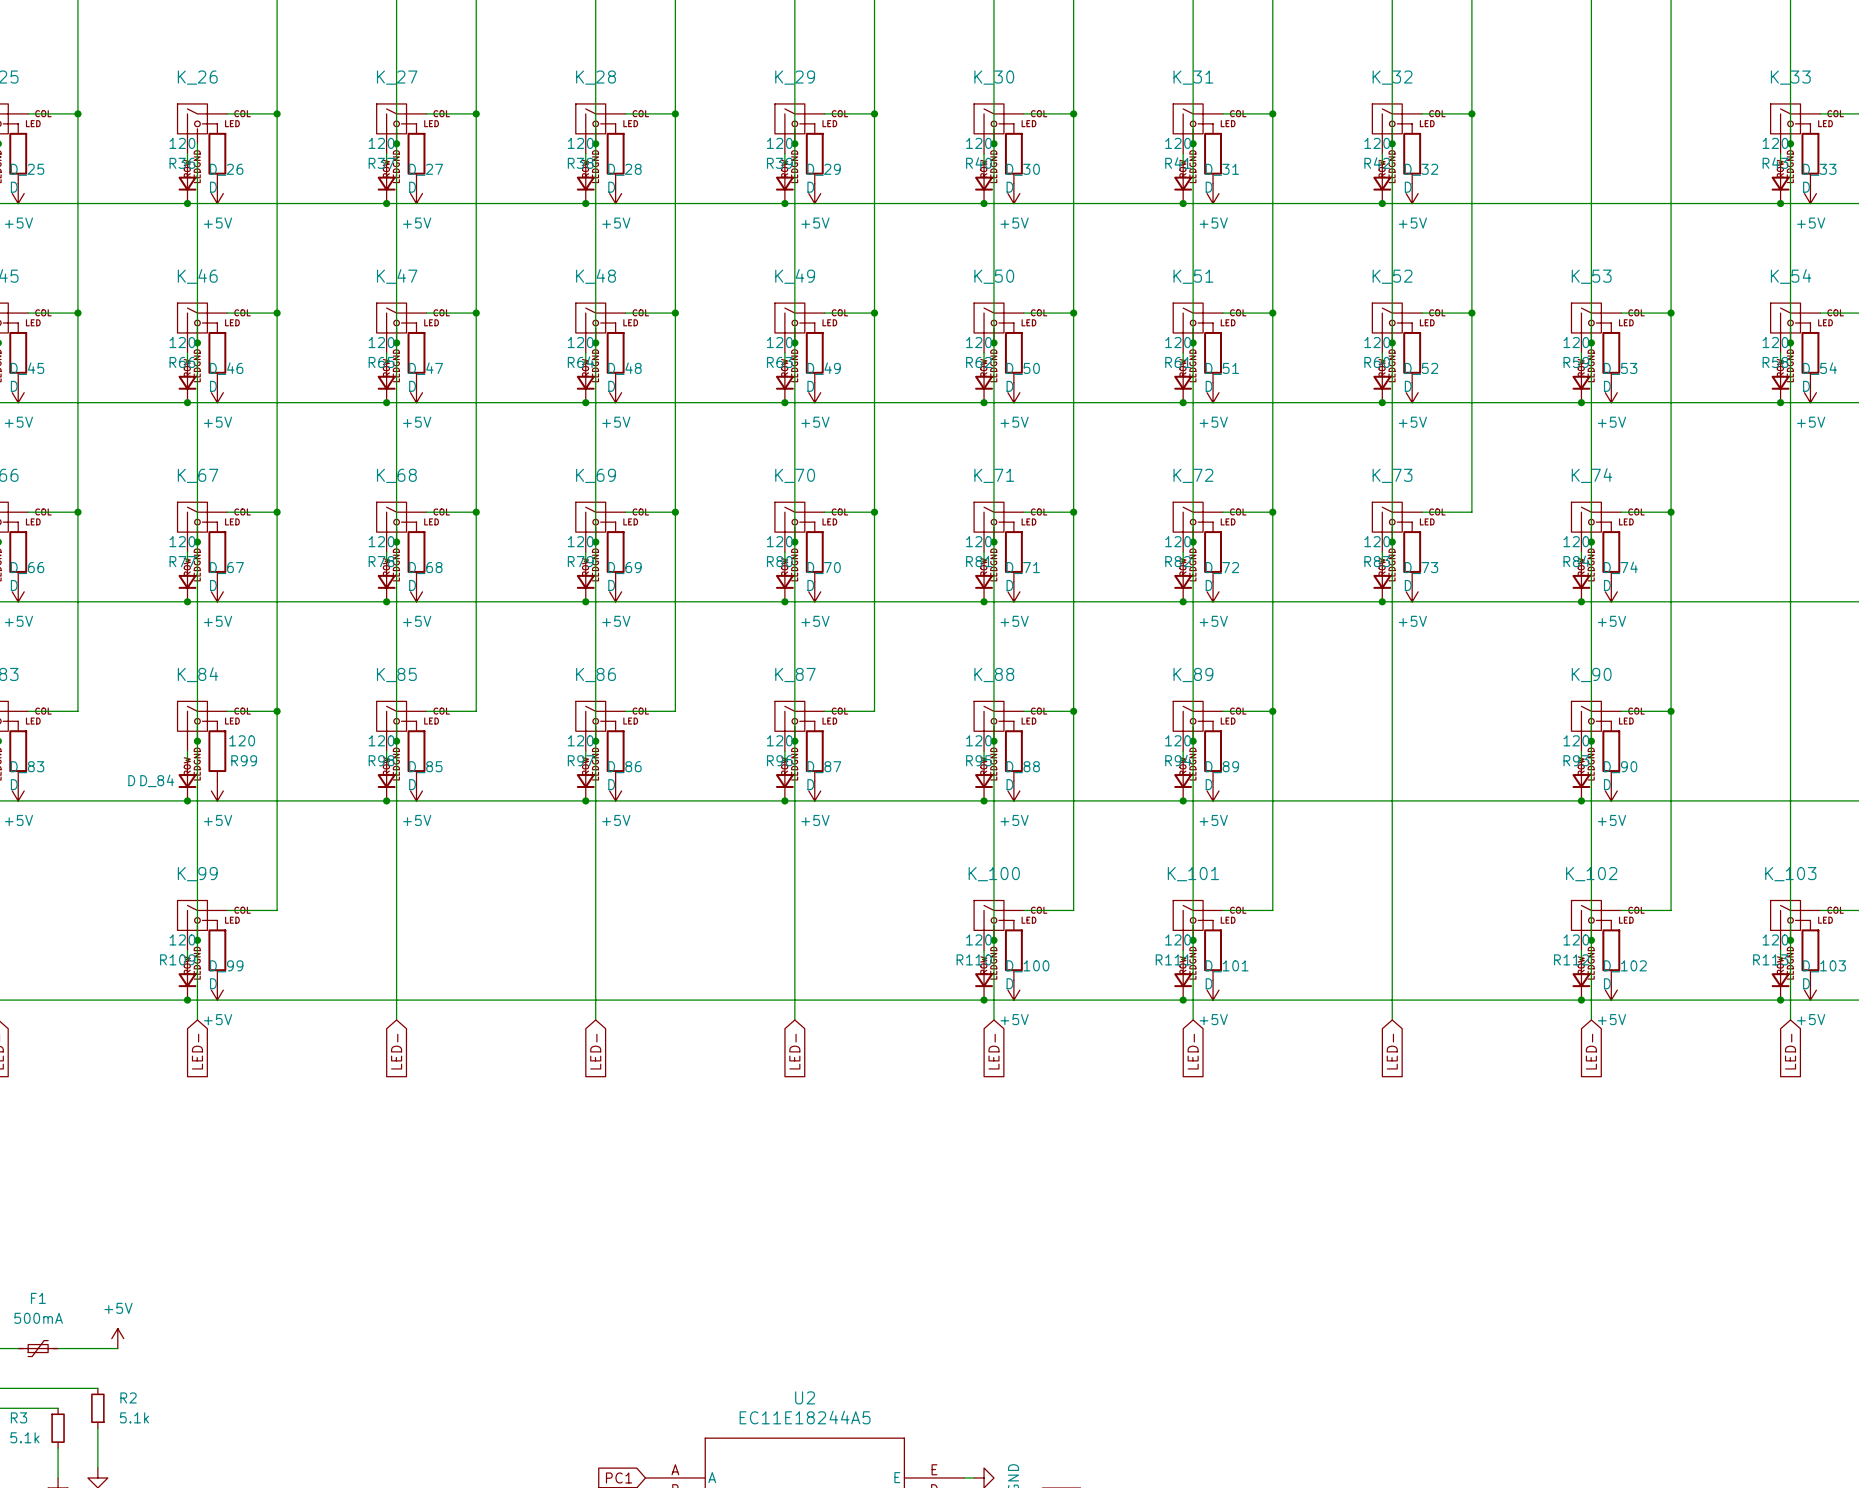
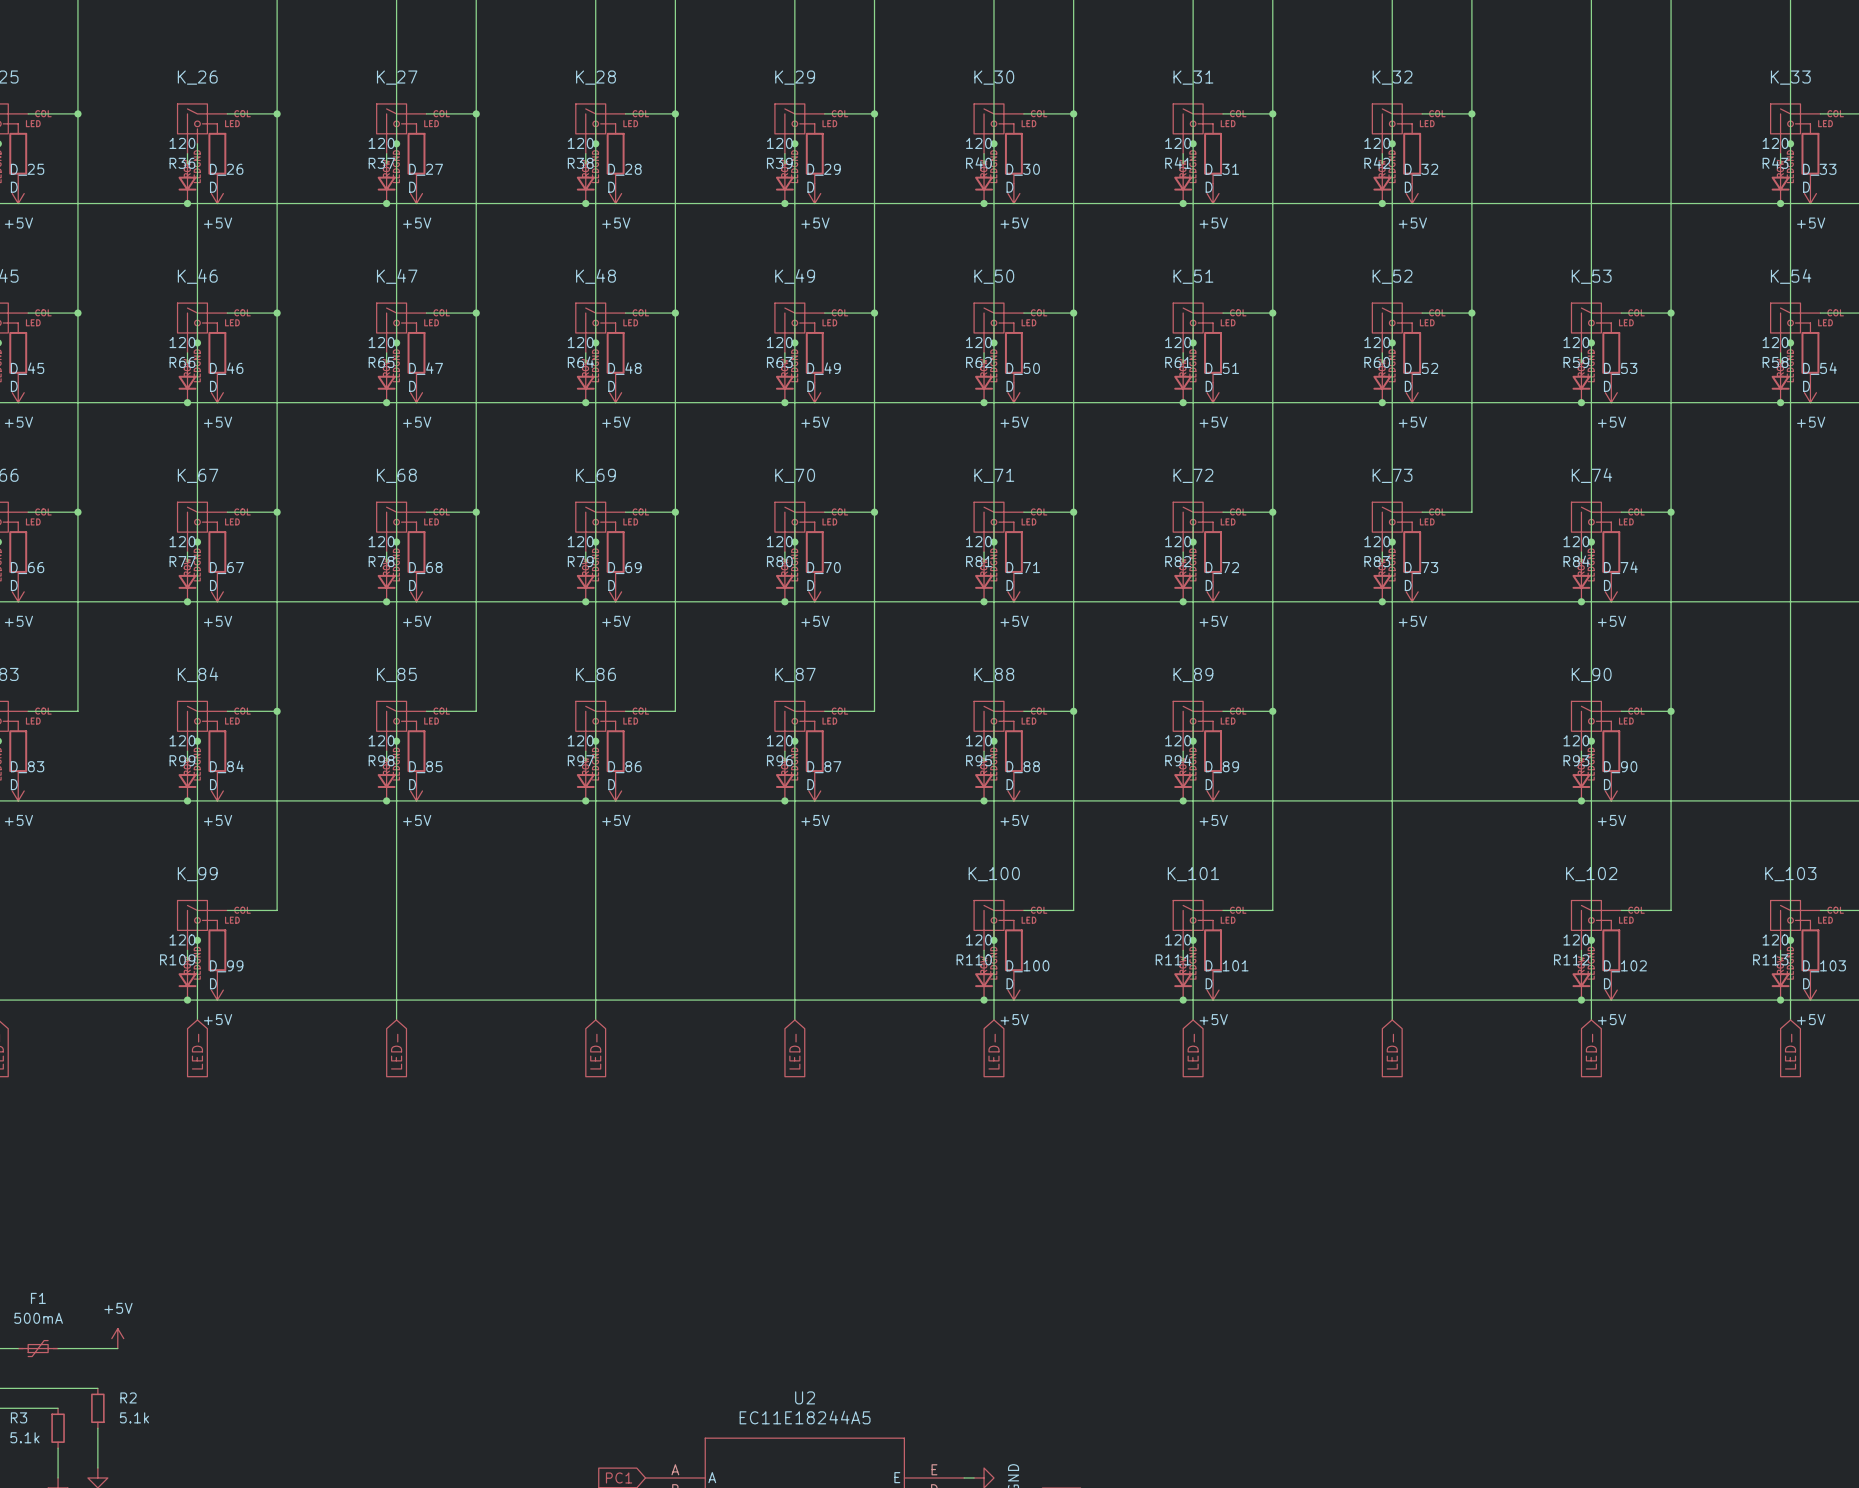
R99 value position: 120 (242, 740) -> 120 (182, 740)
R99 name position: R99 (244, 760) -> R99 (182, 760)
D_84 value position: D (131, 780) -> D (213, 784)
D_84 name position: D_84 (157, 780) -> D_84 (226, 766)

